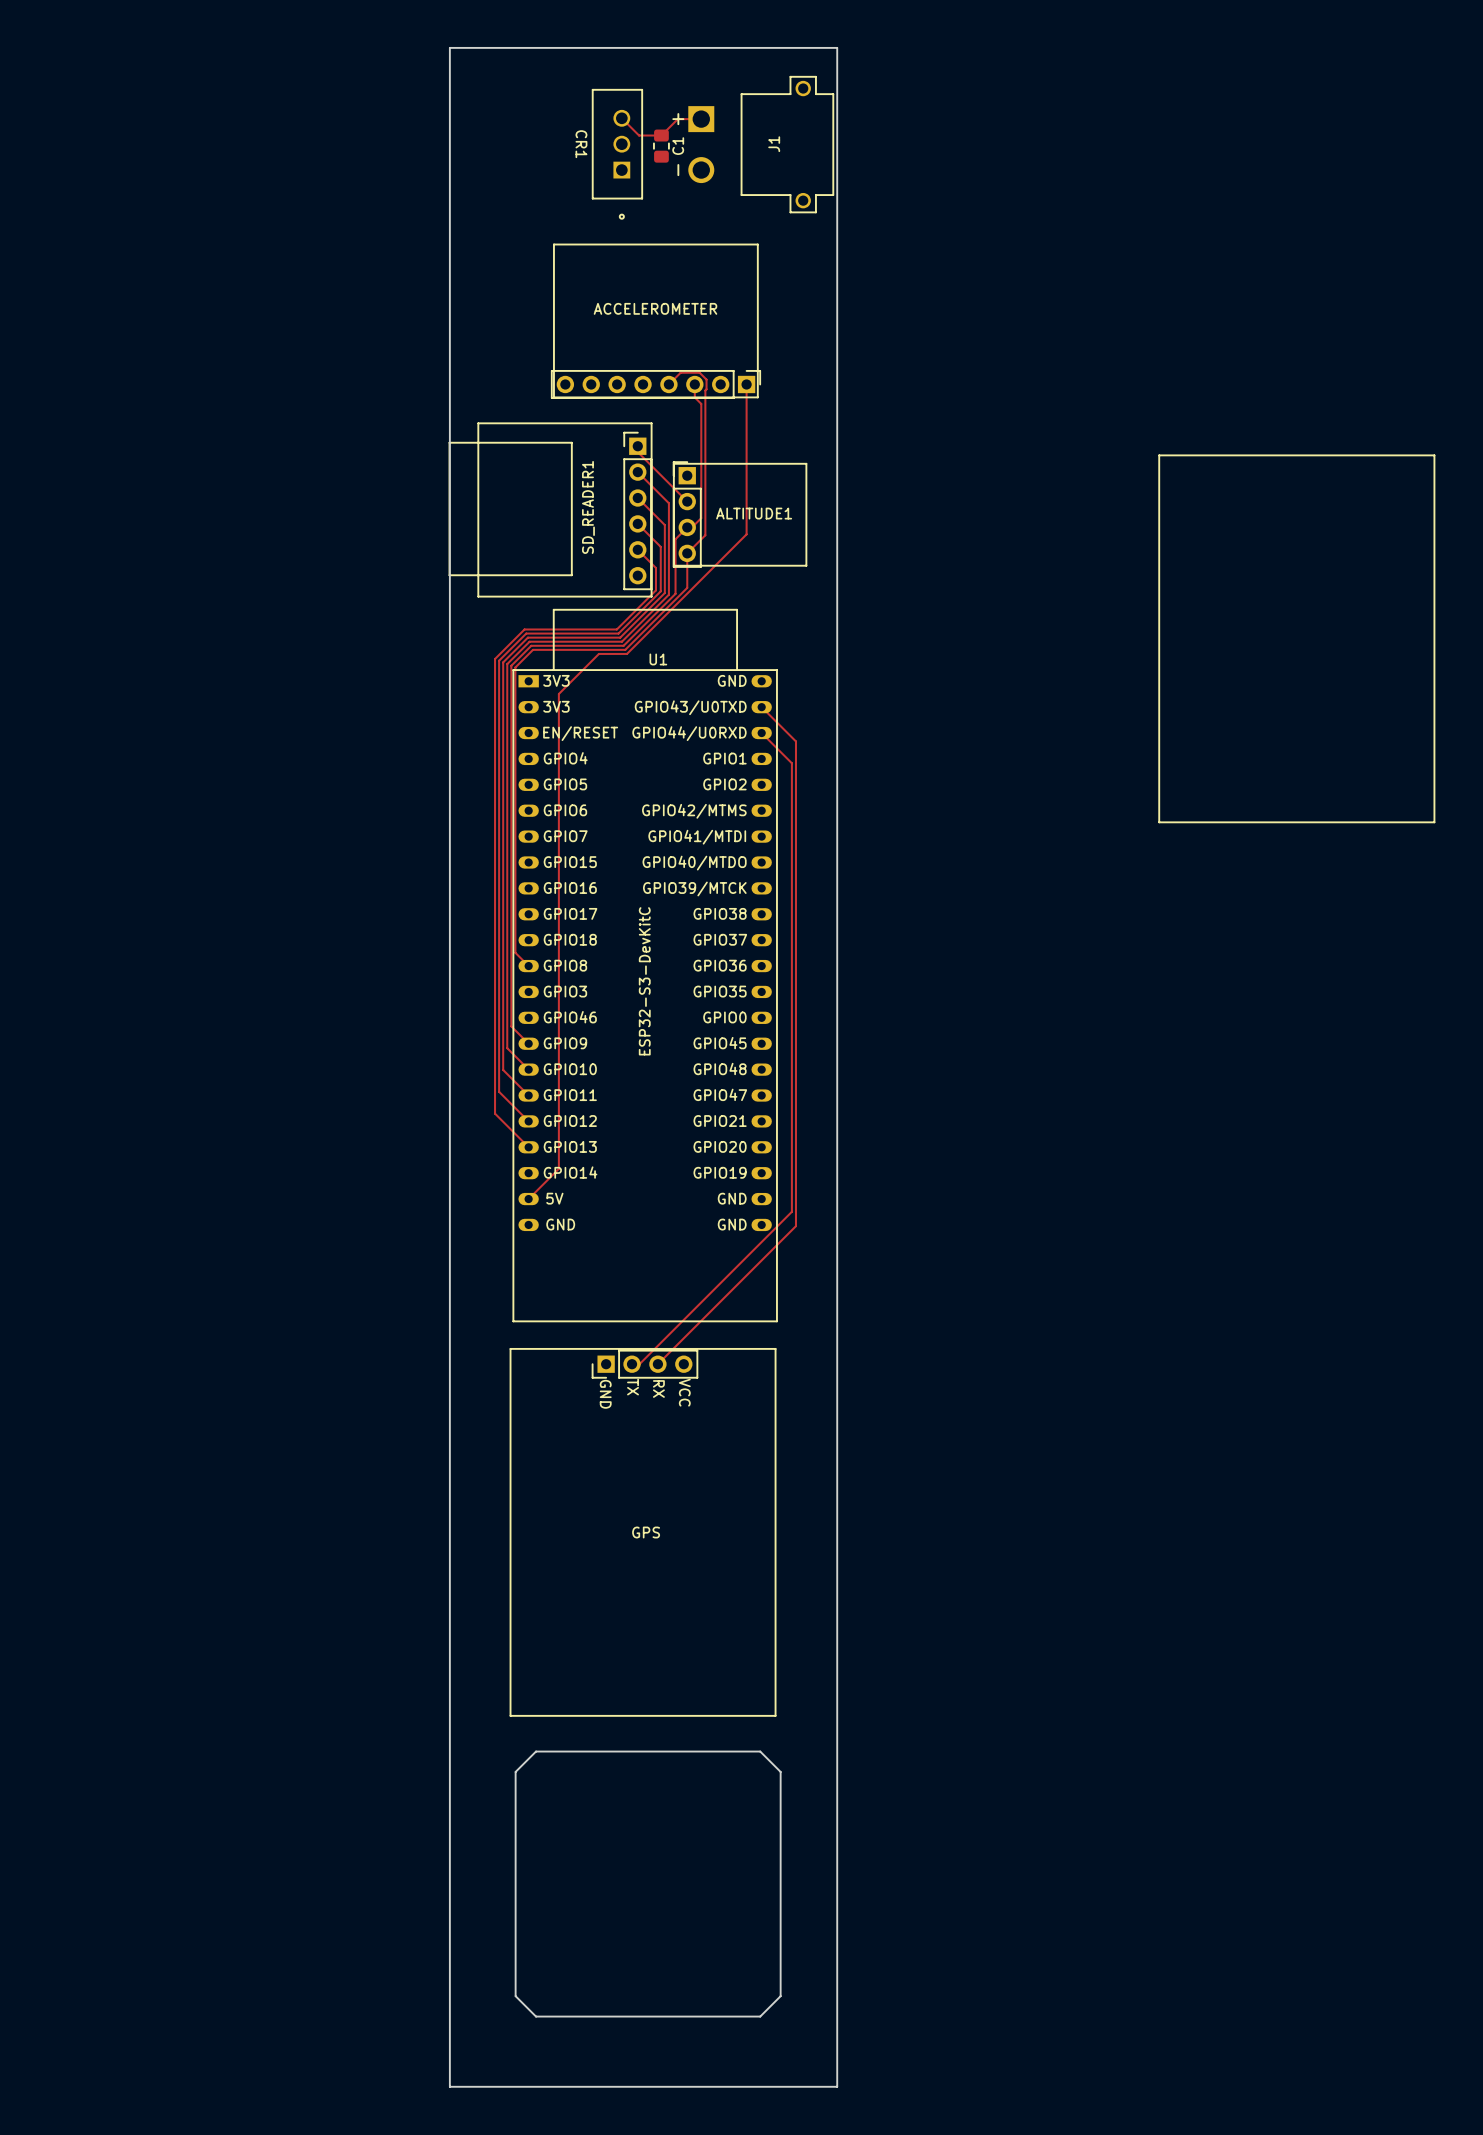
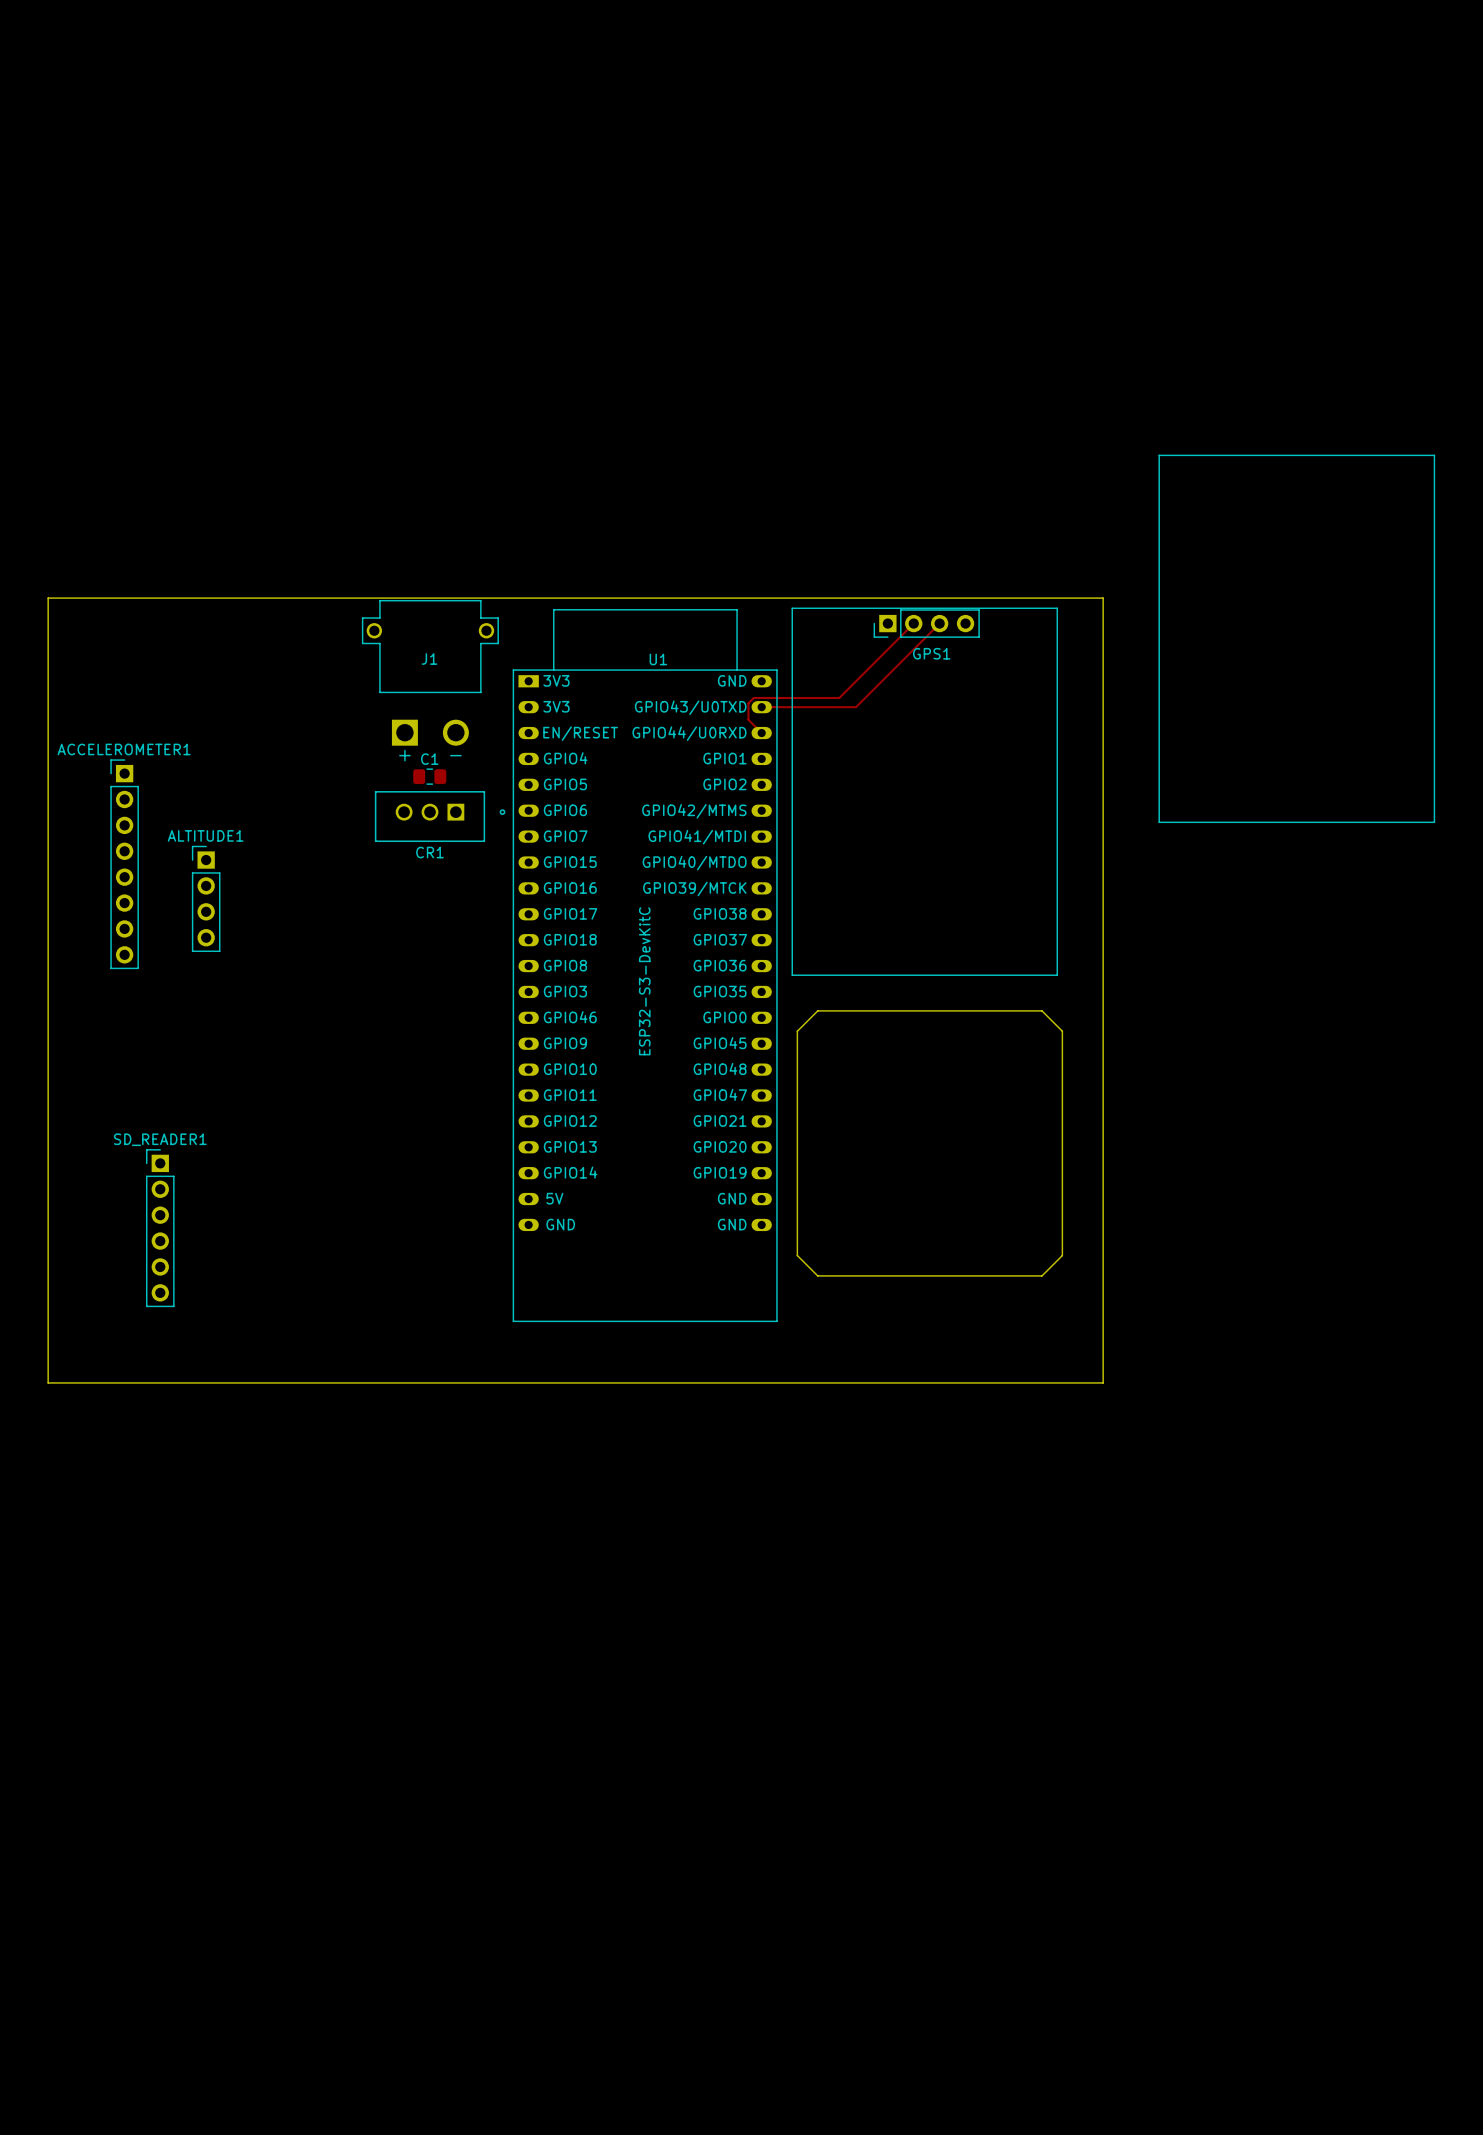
board edge: (449, 47) (837, 47) (837, 2086) (449, 2086) (449, 47) -> none
top track: (621, 118) (639, 135) (661, 135) (677, 119) (701, 119) -> none
J1 rotation: 0° (753, 144) -> 90° counterclockwise (430, 680)
J1 position: (753, 144) -> (430, 680)
C1 rotation: 0° (661, 146) -> 90° clockwise (429, 776)
C1 position: (661, 146) -> (429, 776)
C1 name position: C1 (678, 146) -> C1 (429, 759)
CR1 rotation: 0° (617, 154) -> 90° counterclockwise (440, 816)
CR1 position: (617, 154) -> (440, 816)
line: (553, 244) (757, 244) (757, 397) (553, 397) (553, 244) -> none
ACCELEROMETER: (655, 384) -> none
top track: (668, 384) (680, 372) (699, 372) (706, 379) (705, 535) (687, 553) (687, 587) (625, 649) (533, 649) (515, 667) (515, 952) (528, 966) -> none
top track: (694, 384) (694, 397) (701, 403) (701, 518) (691, 527) (687, 527) (675, 539) (675, 593) (623, 645) (531, 645) (511, 665) (511, 1026) (528, 1043) -> none
top track: (746, 384) (746, 534) (626, 653) (598, 653) (558, 693) (558, 1168) (528, 1199) -> none
line: (478, 423) (651, 423) (651, 596) (478, 596) (478, 423) -> none
line: (449, 442) (571, 442) (571, 575) (449, 575) (449, 442) -> none
top track: (637, 446) (637, 452) (687, 501) -> none
line: (673, 463) (806, 463) (806, 565) (673, 565) (673, 463) -> none
top track: (637, 472) (668, 503) (668, 594) (621, 641) (529, 641) (507, 664) (507, 1048) (528, 1069) -> none
top track: (637, 498) (664, 525) (664, 593) (620, 637) (527, 637) (503, 662) (503, 1070) (528, 1095) -> none
SD_READER1 name rotation: 0° (588, 507) -> 90° clockwise (160, 1139)
SD_READER1 position: (637, 510) -> (160, 1228)
ALTITUDE1 name position: ALTITUDE1 (754, 513) -> ALTITUDE1 (205, 835)
ALTITUDE1 position: (687, 514) -> (206, 898)
top track: (637, 523) (660, 546) (660, 591) (618, 633) (526, 633) (499, 660) (499, 1091) (528, 1121) -> none
top track: (637, 549) (655, 567) (655, 590) (616, 629) (524, 629) (495, 659) (495, 1113) (528, 1147) -> none
board edge: none -> (48, 598) (1103, 598) (1103, 1382) (48, 1382) (48, 598)
line: none -> (792, 608) (1057, 608) (1057, 975) (792, 975) (792, 608)
GPS1: none -> (926, 623)
top track: (761, 707) (795, 741) (795, 1226) (657, 1364) -> (761, 707) (856, 707) (939, 623)
top track: (761, 733) (791, 763) (791, 1211) (639, 1364) (632, 1364) -> (761, 733) (748, 719) (748, 703) (753, 697) (839, 697) (913, 623)
ACCELEROMETER1: none -> (124, 864)
board edge: none -> (817, 1010) (797, 1031) (797, 1255) (817, 1275) (1041, 1275) (1062, 1255) (1062, 1031) (1041, 1010) (817, 1010)
line: (510, 1348) (775, 1348) (775, 1715) (510, 1715) (510, 1348) -> none
GPS: (644, 1364) -> none
text: TX (633, 1387) -> none
text: RX (658, 1388) -> none
text: VCC (684, 1392) -> none
text: GND (605, 1394) -> none
board edge: (536, 1751) (515, 1771) (515, 1996) (536, 2016) (760, 2016) (780, 1996) (780, 1771) (760, 1751) (536, 1751) -> none

